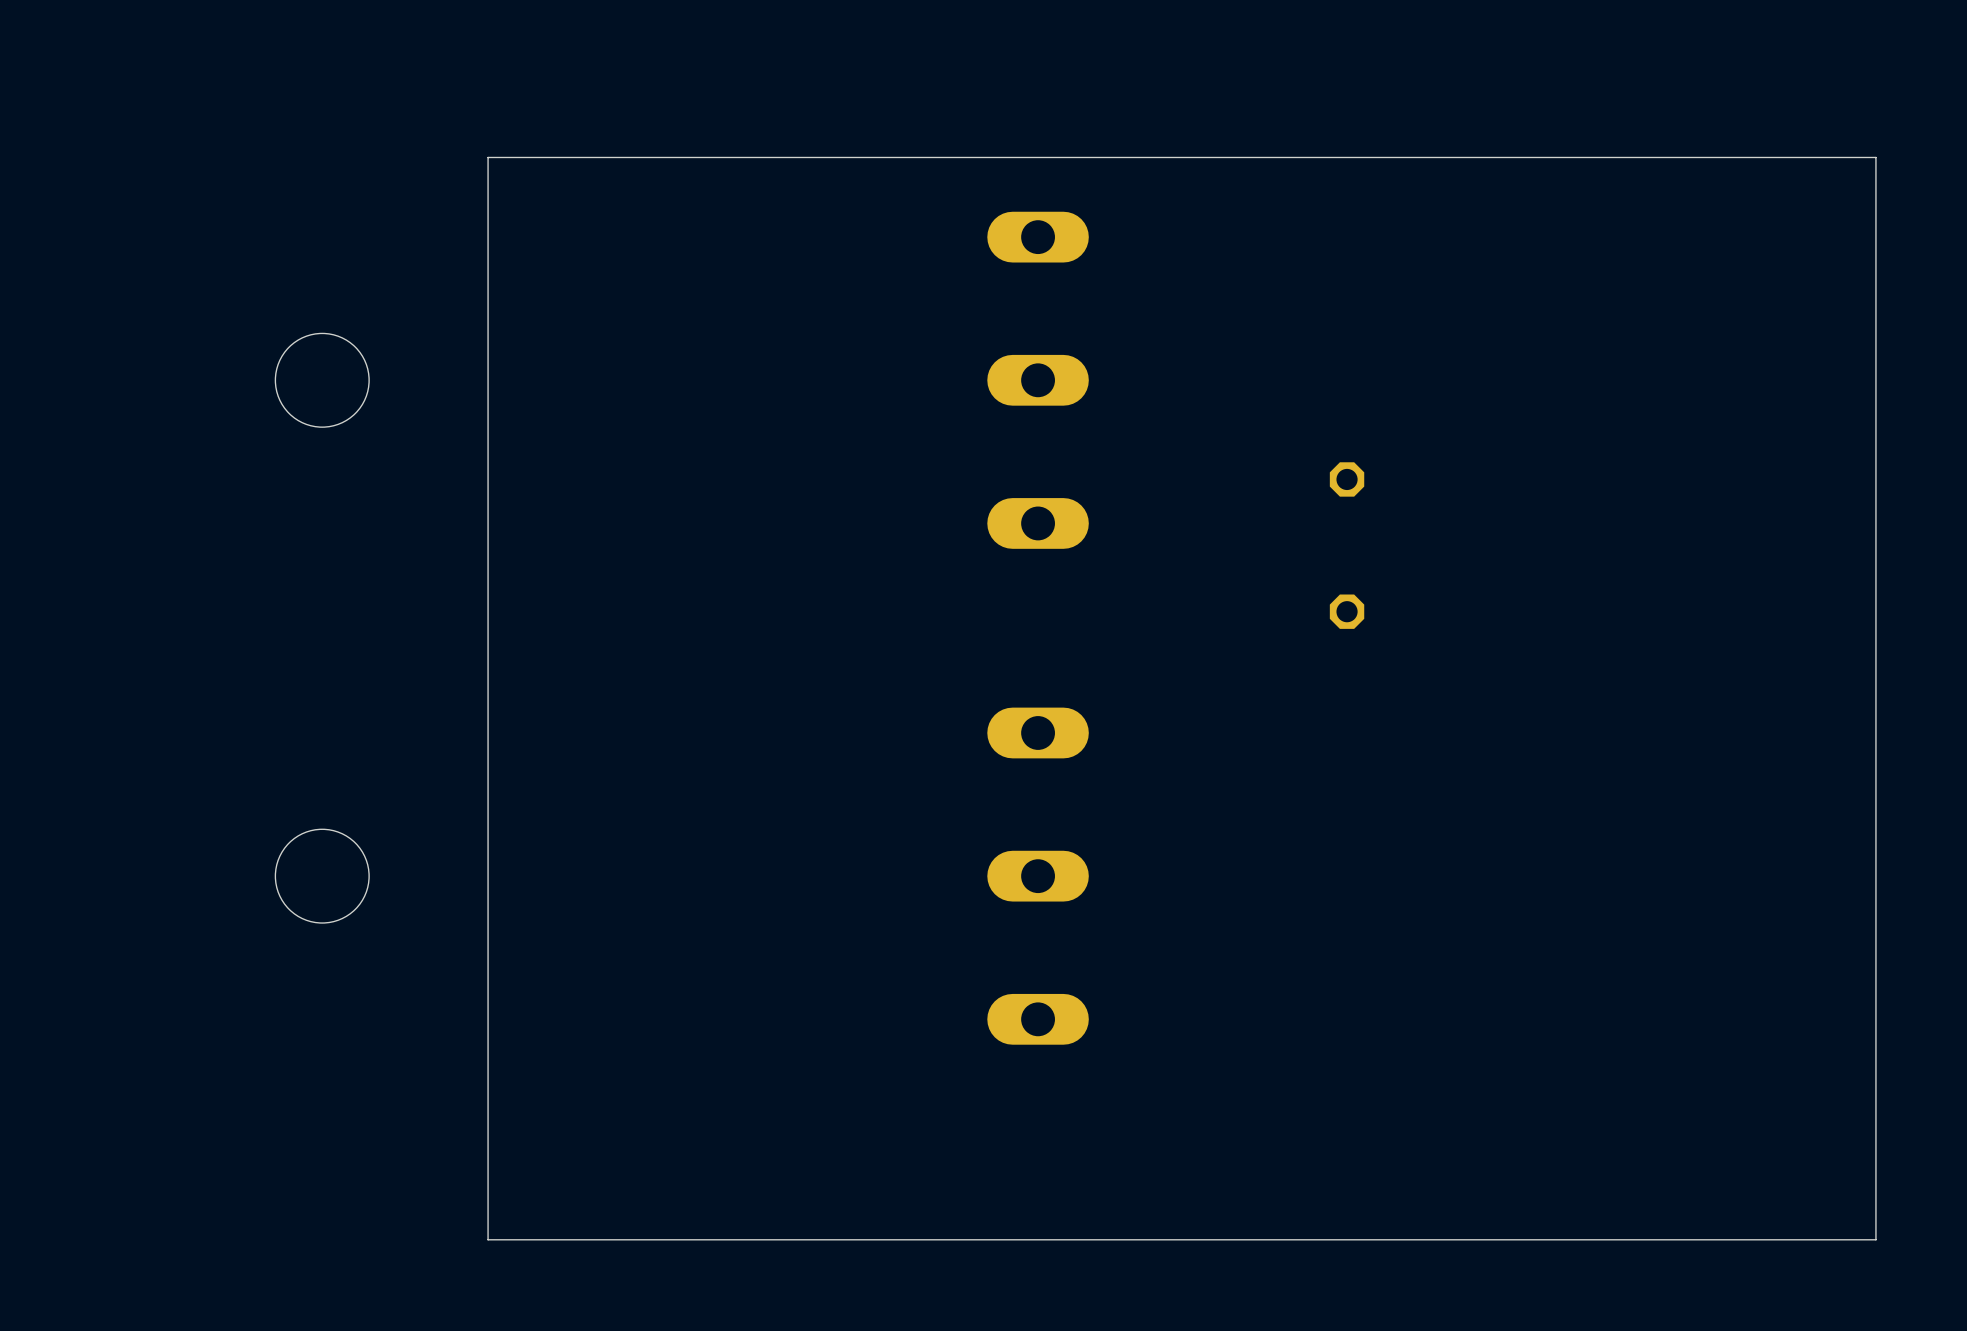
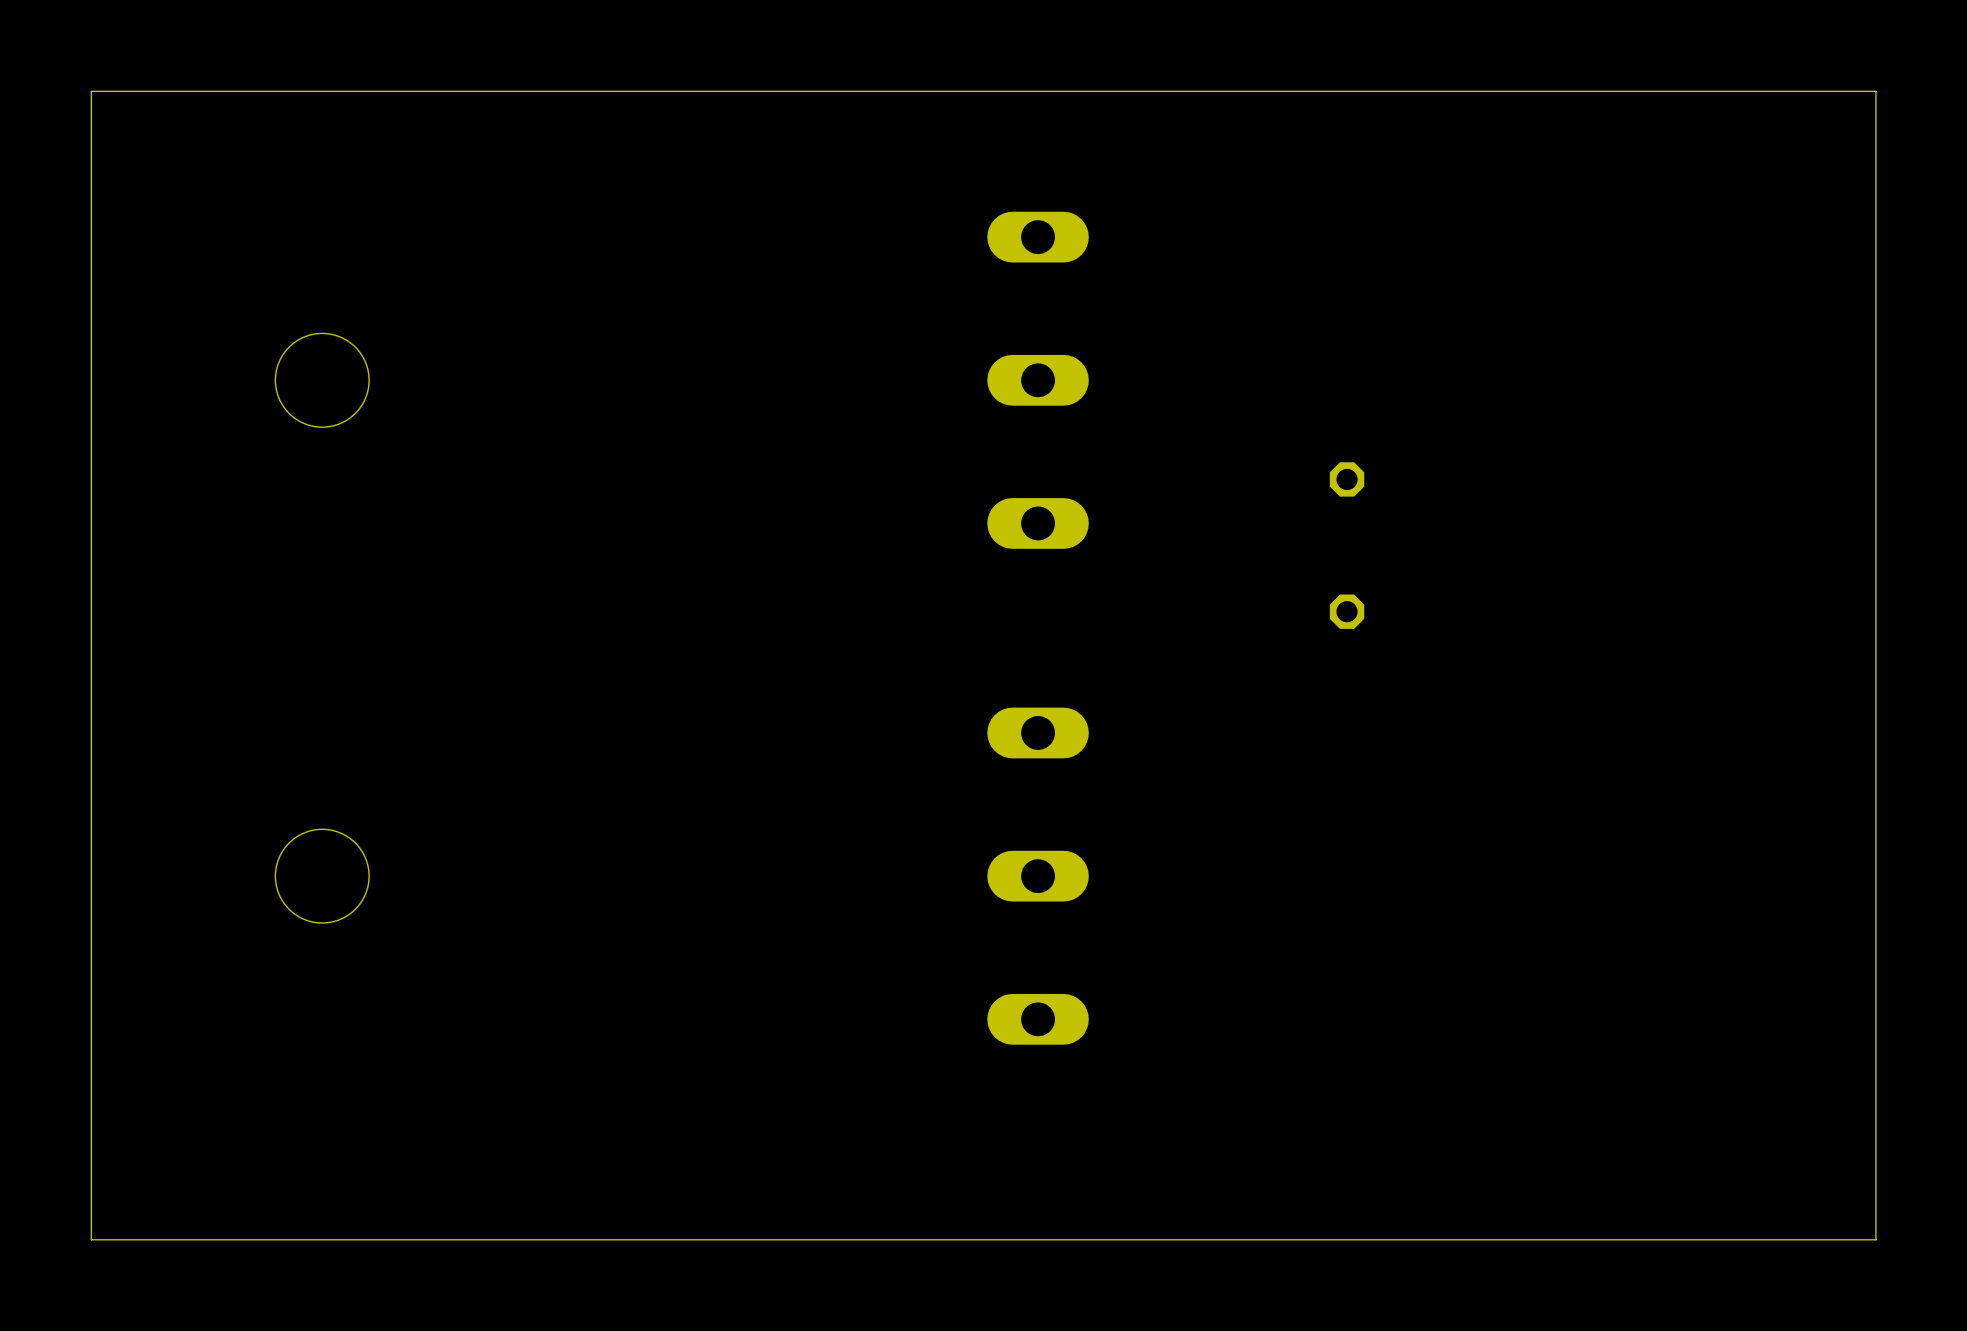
board edge: (1875, 157) (488, 157) (488, 1239) -> (1875, 157) (1875, 91) (91, 91) (91, 1239) (488, 1239)

